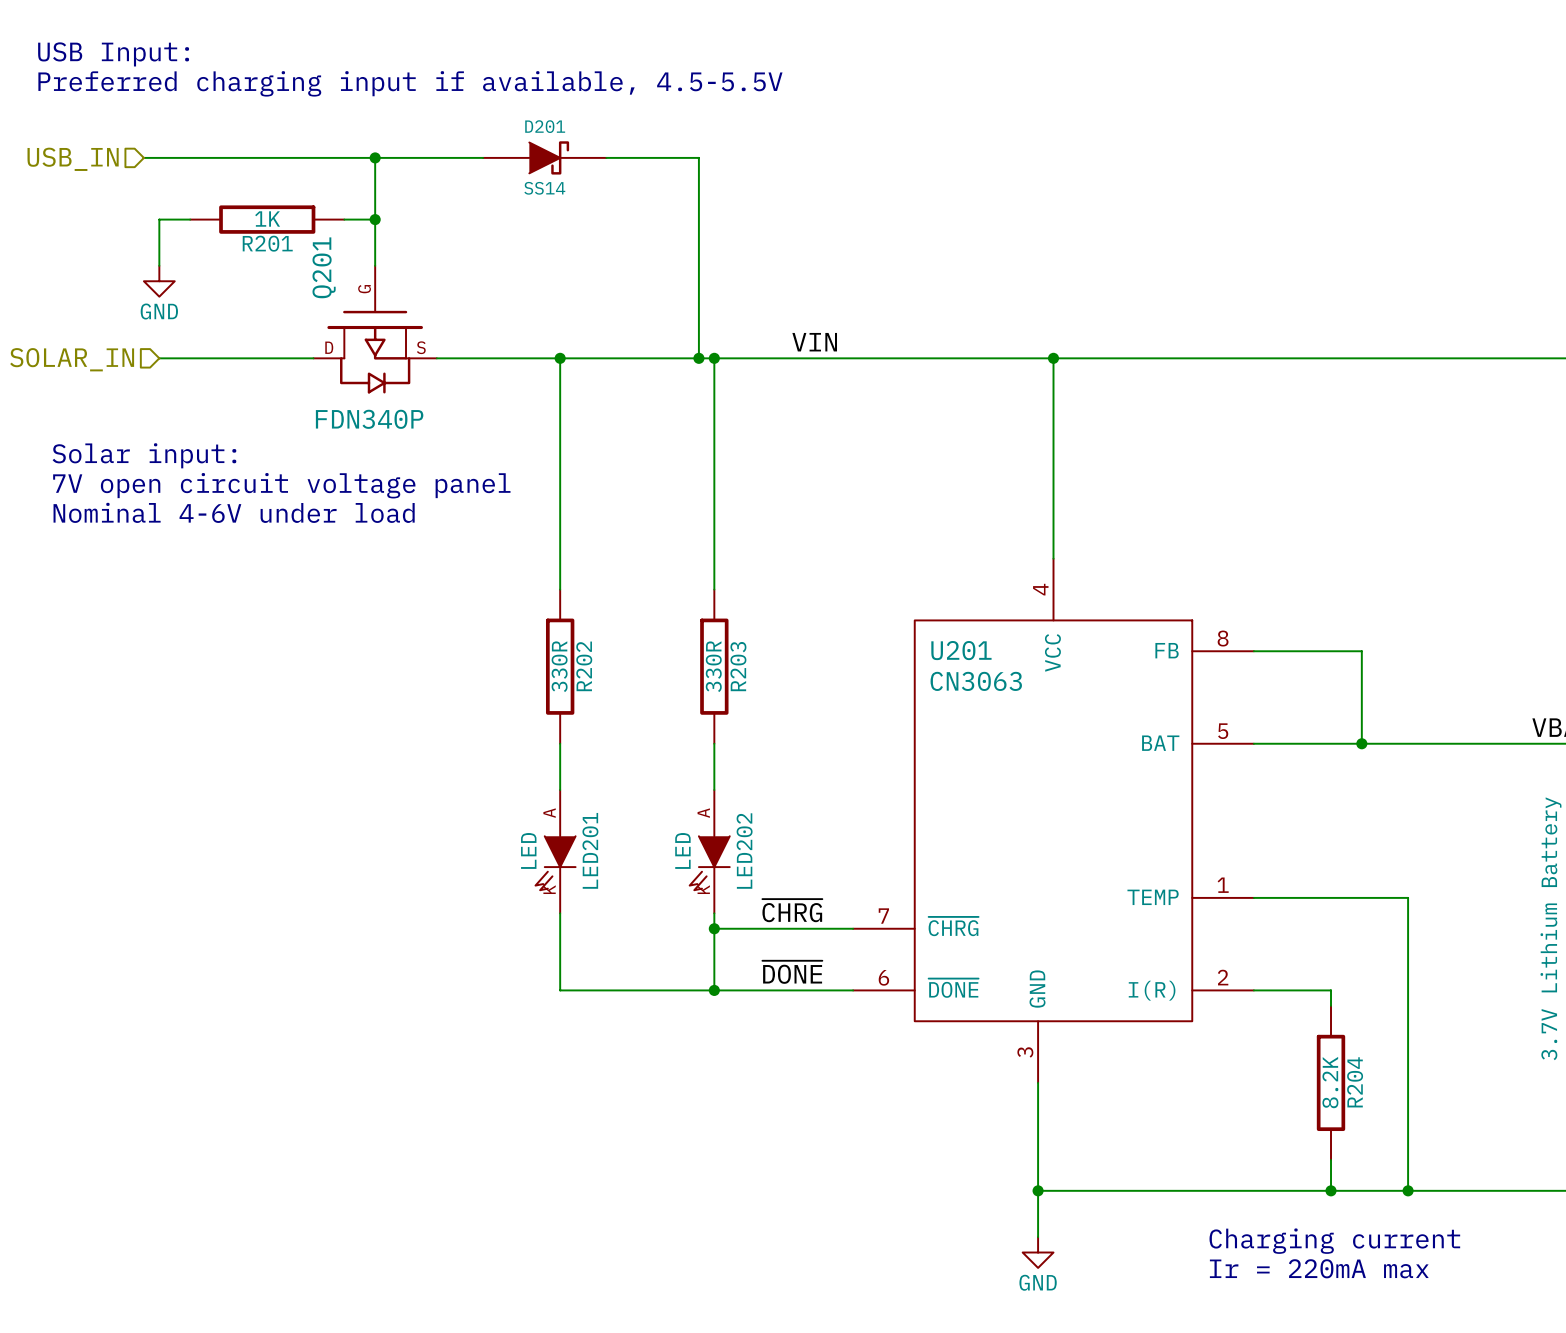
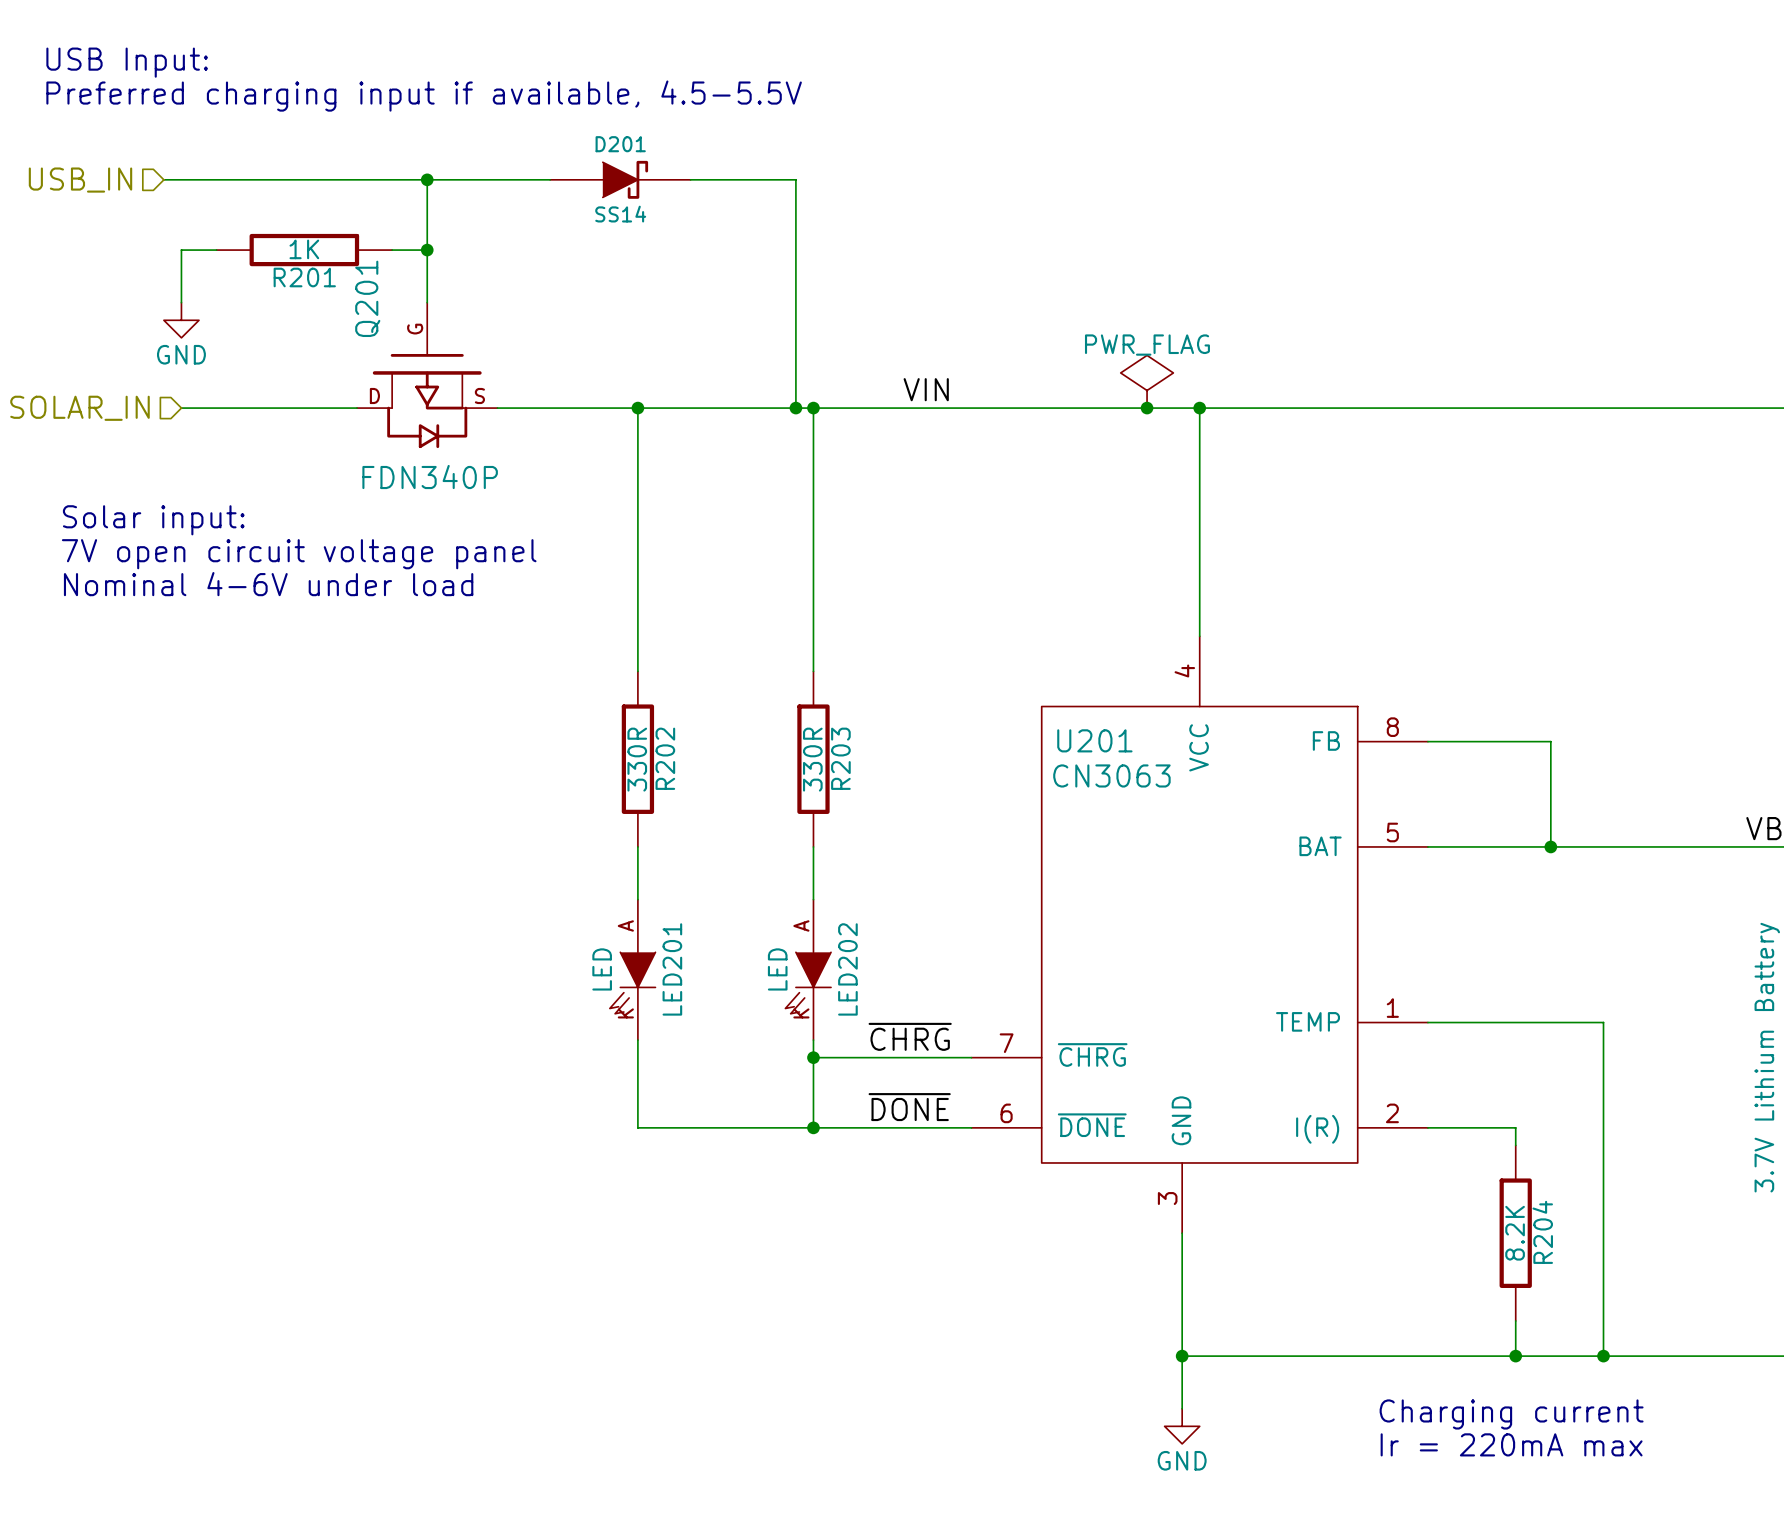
power symbol: none -> PWR_FLAG (1147, 381)
junction: none -> (1147, 408)

